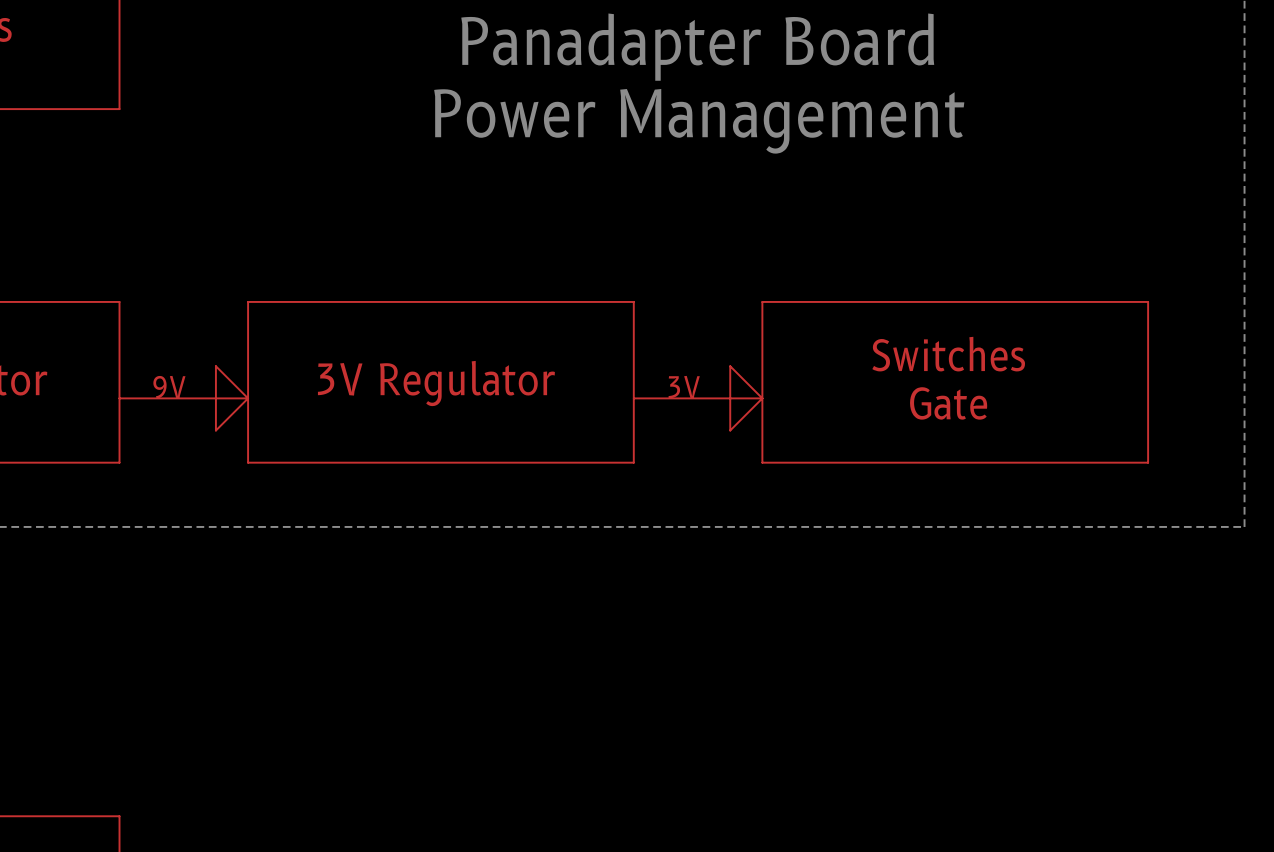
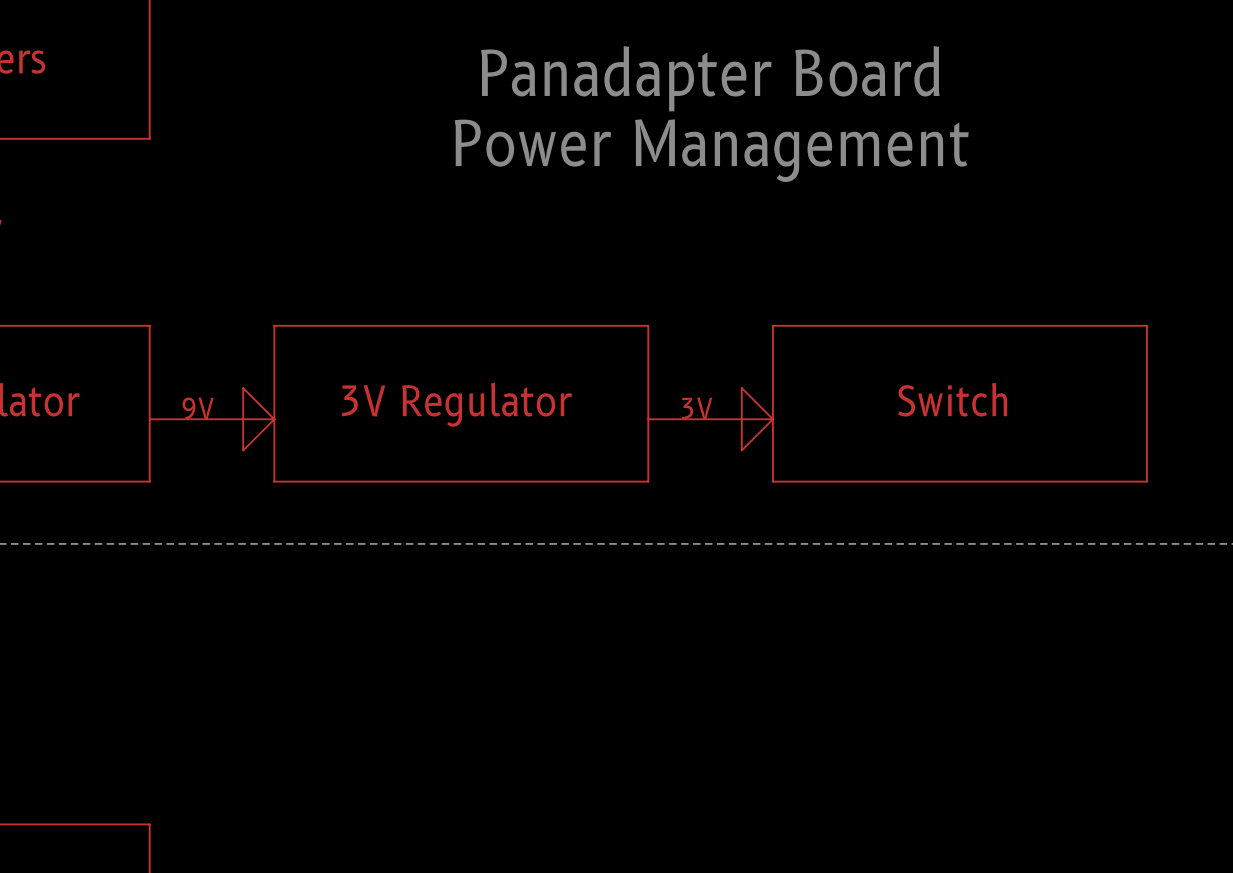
text: Switches (948, 354) -> Switch (952, 399)
text: Gate (948, 403) -> none

